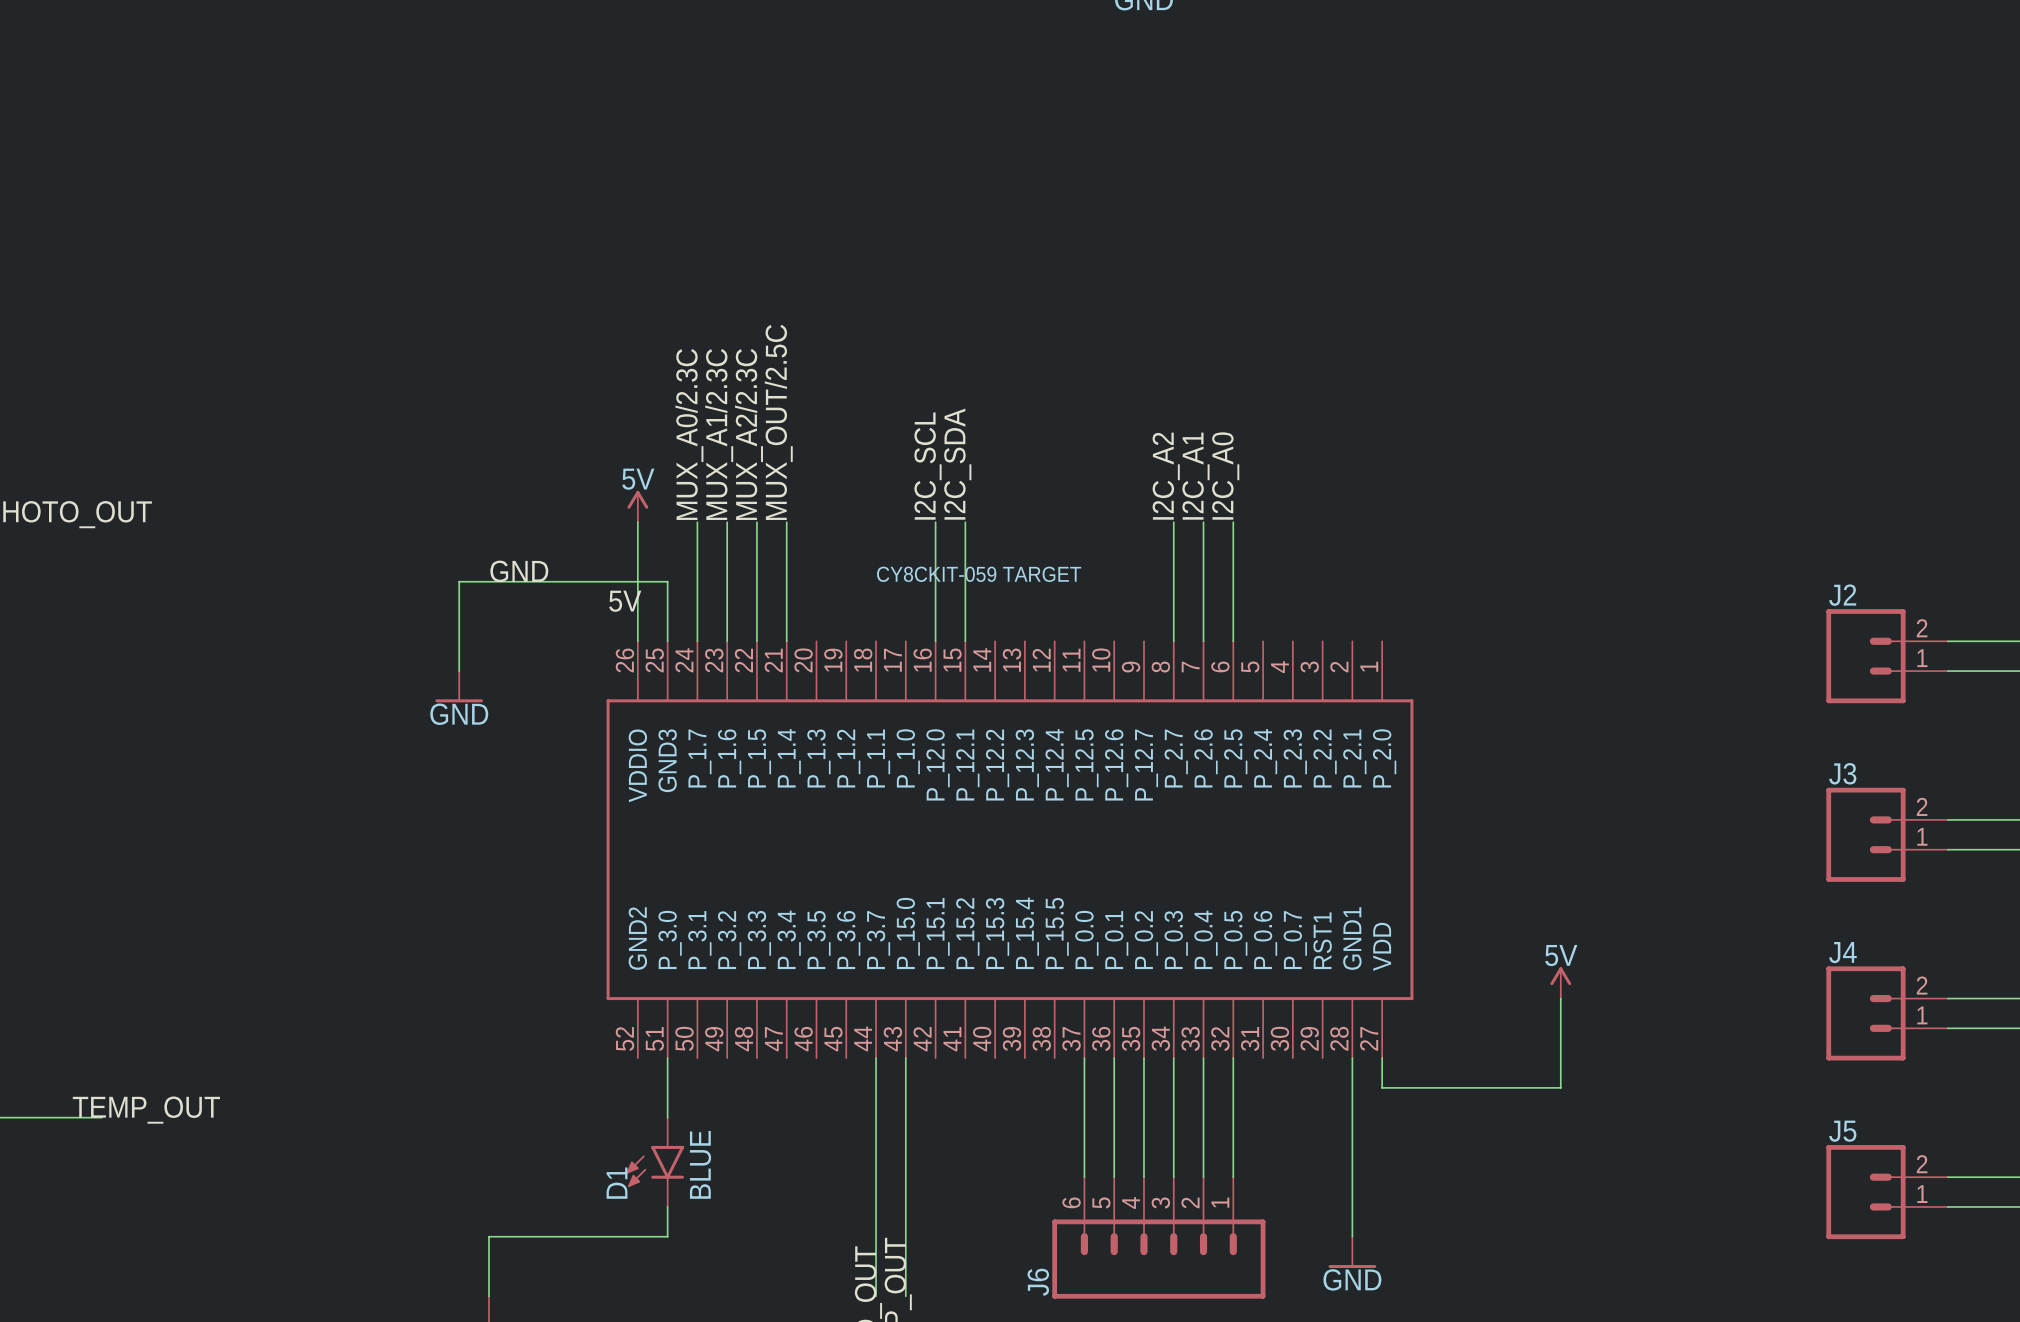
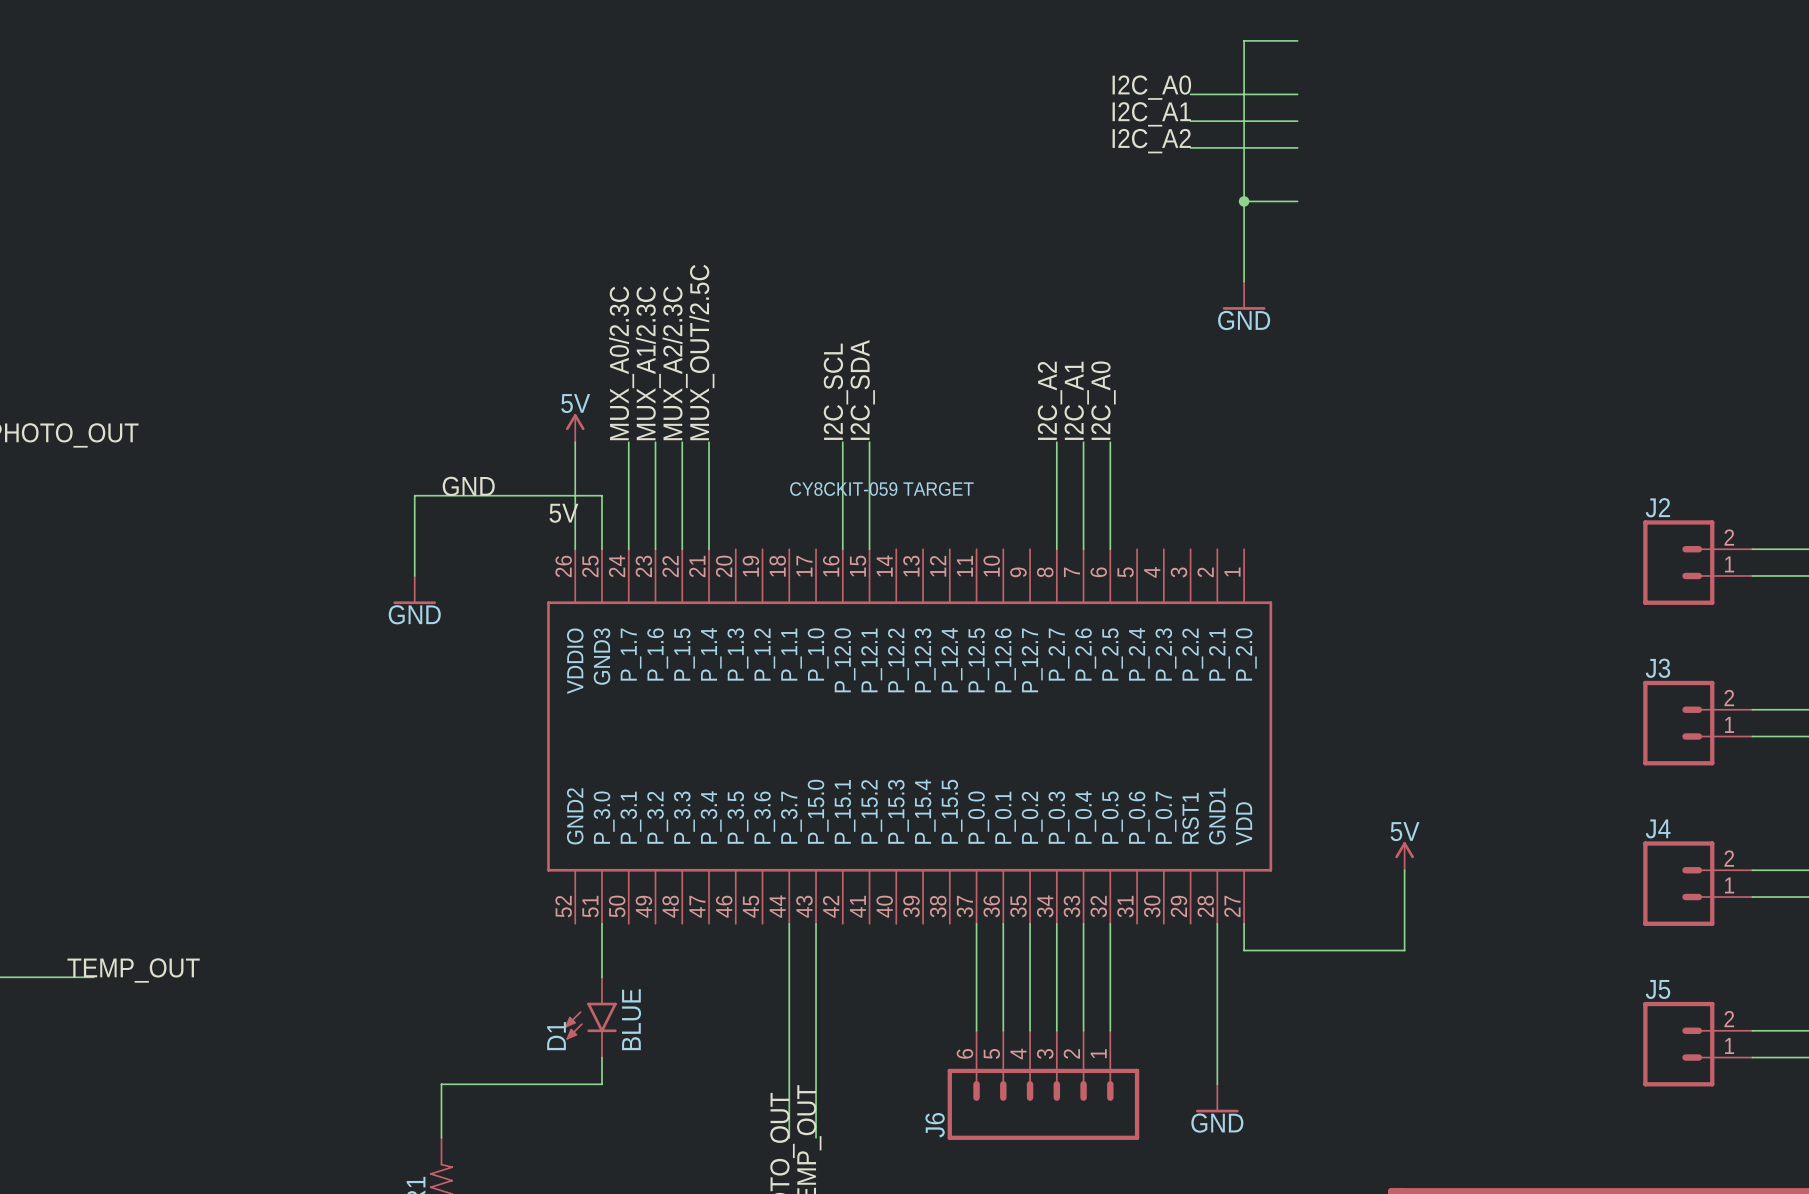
wire: none -> (1297, 40) (1244, 40) (1244, 281)
label: none -> I2C_A0 (1151, 87)
wire: none -> (1190, 94) (1297, 94)
label: none -> I2C_A1 (1151, 114)
wire: none -> (1190, 121) (1297, 121)
label: none -> I2C_A2 (1151, 141)
wire: none -> (1190, 147) (1297, 147)
wire: none -> (1244, 201) (1297, 201)
junction: none -> (1244, 201)
power symbol: none -> GND (1244, 295)

